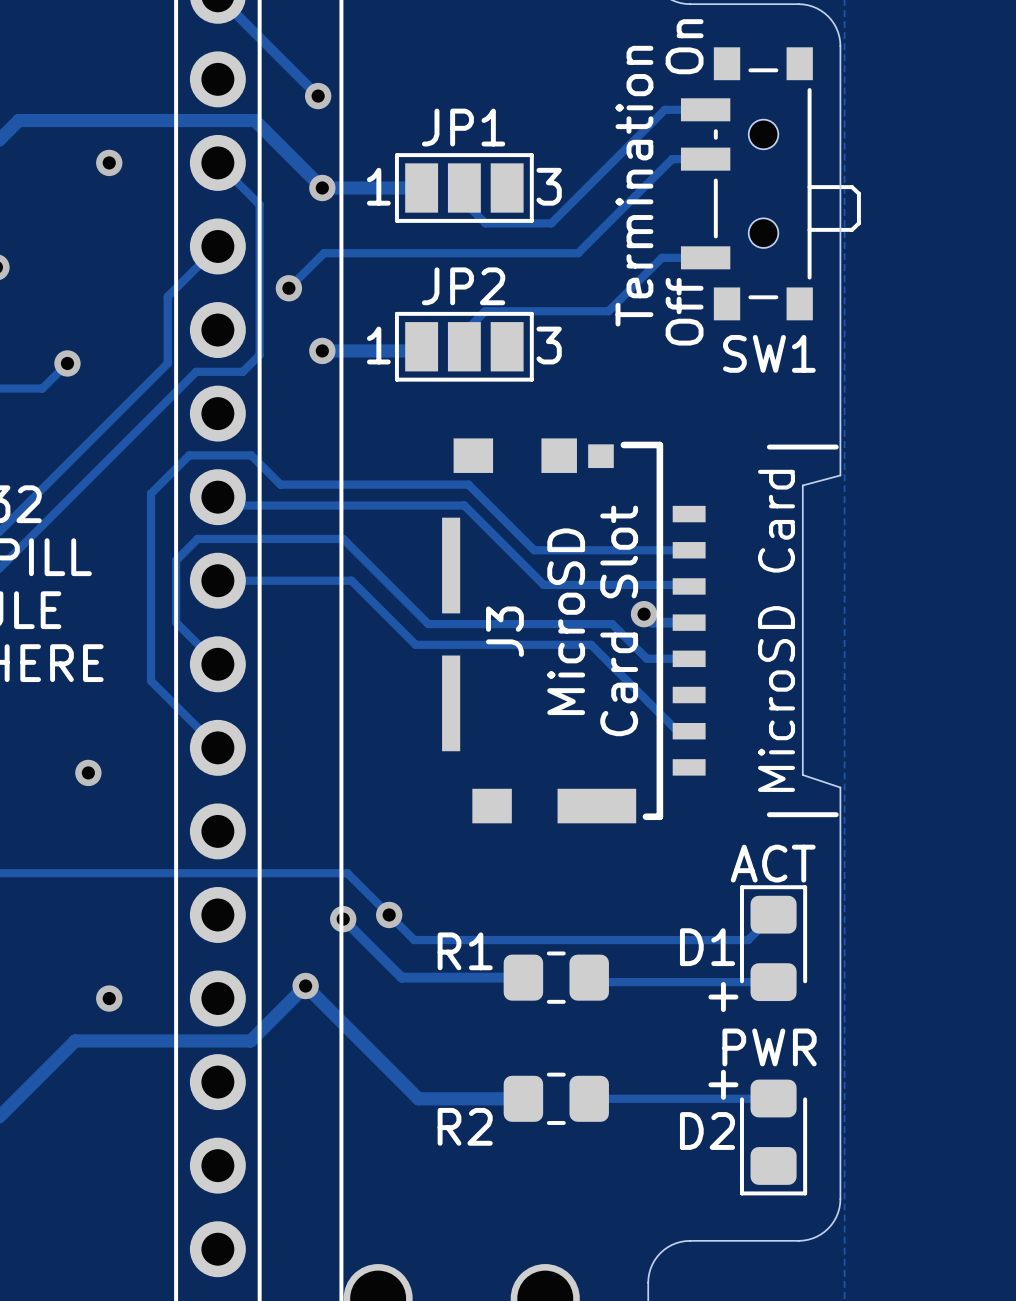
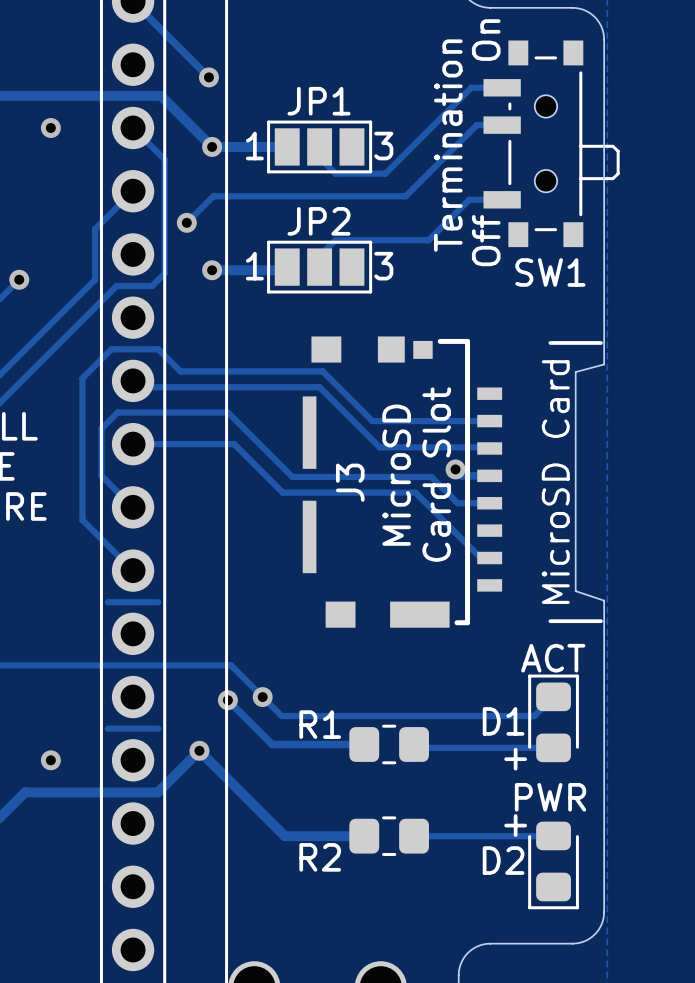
via: (88, 772) -> none
track: none -> (107, 602) (158, 602)
track: none -> (107, 728) (158, 728)

